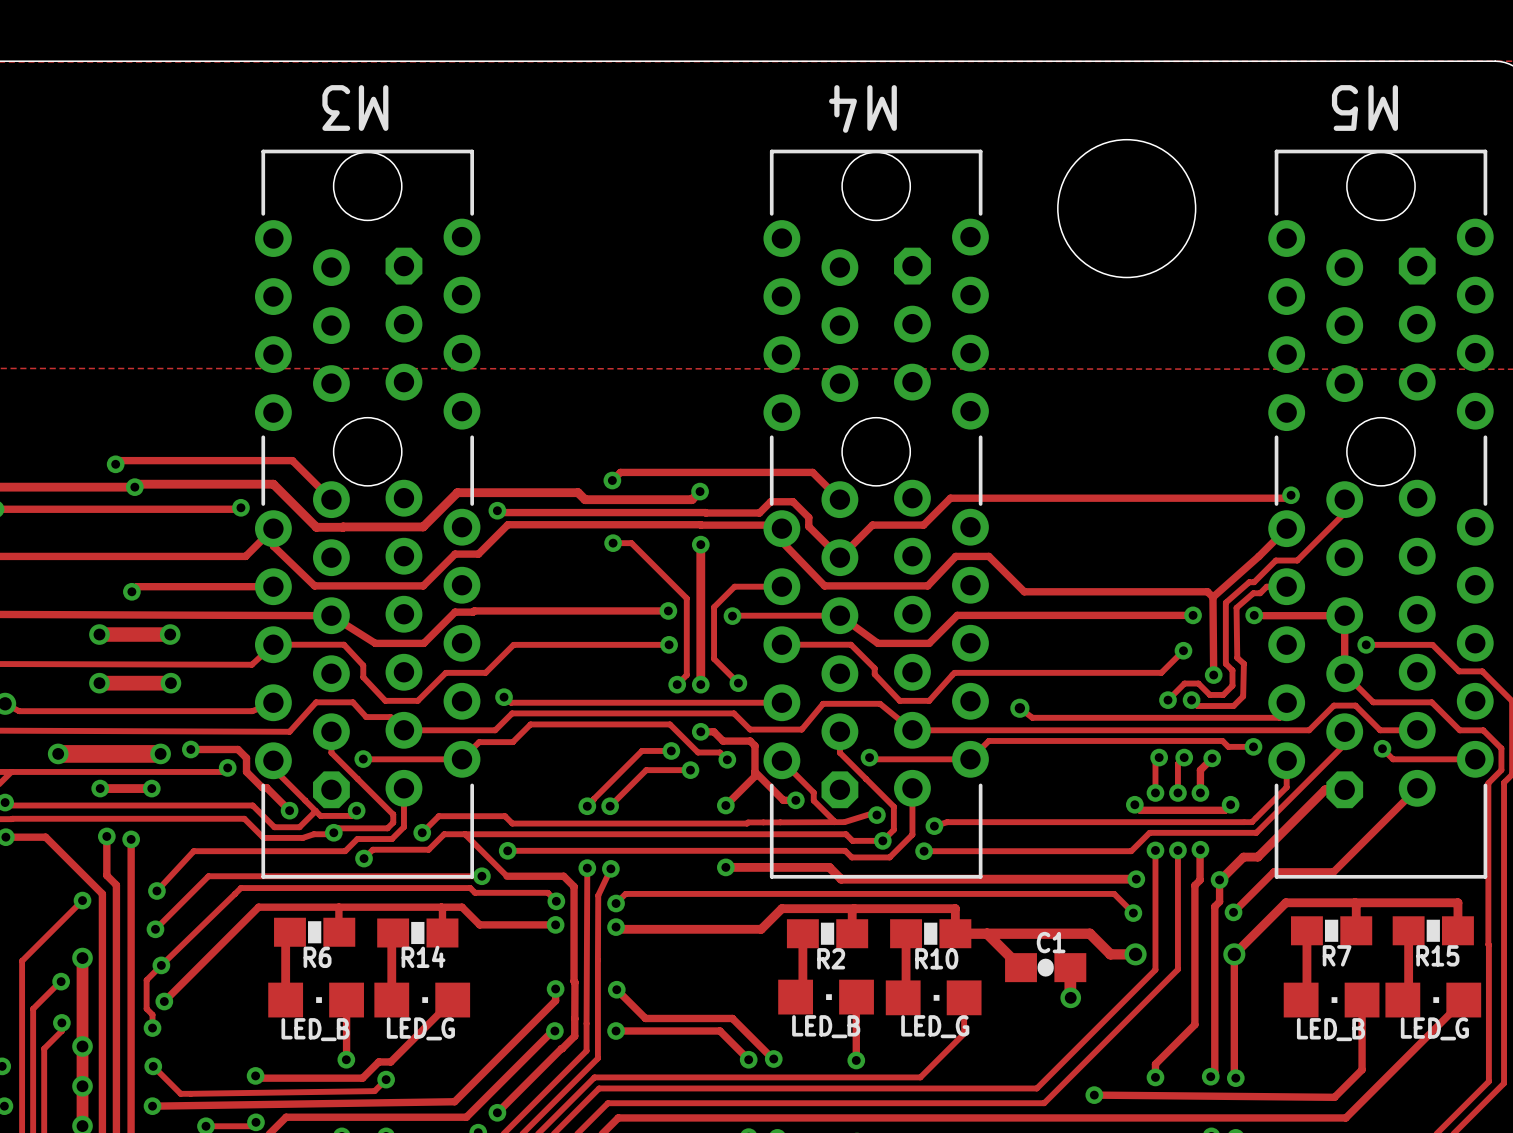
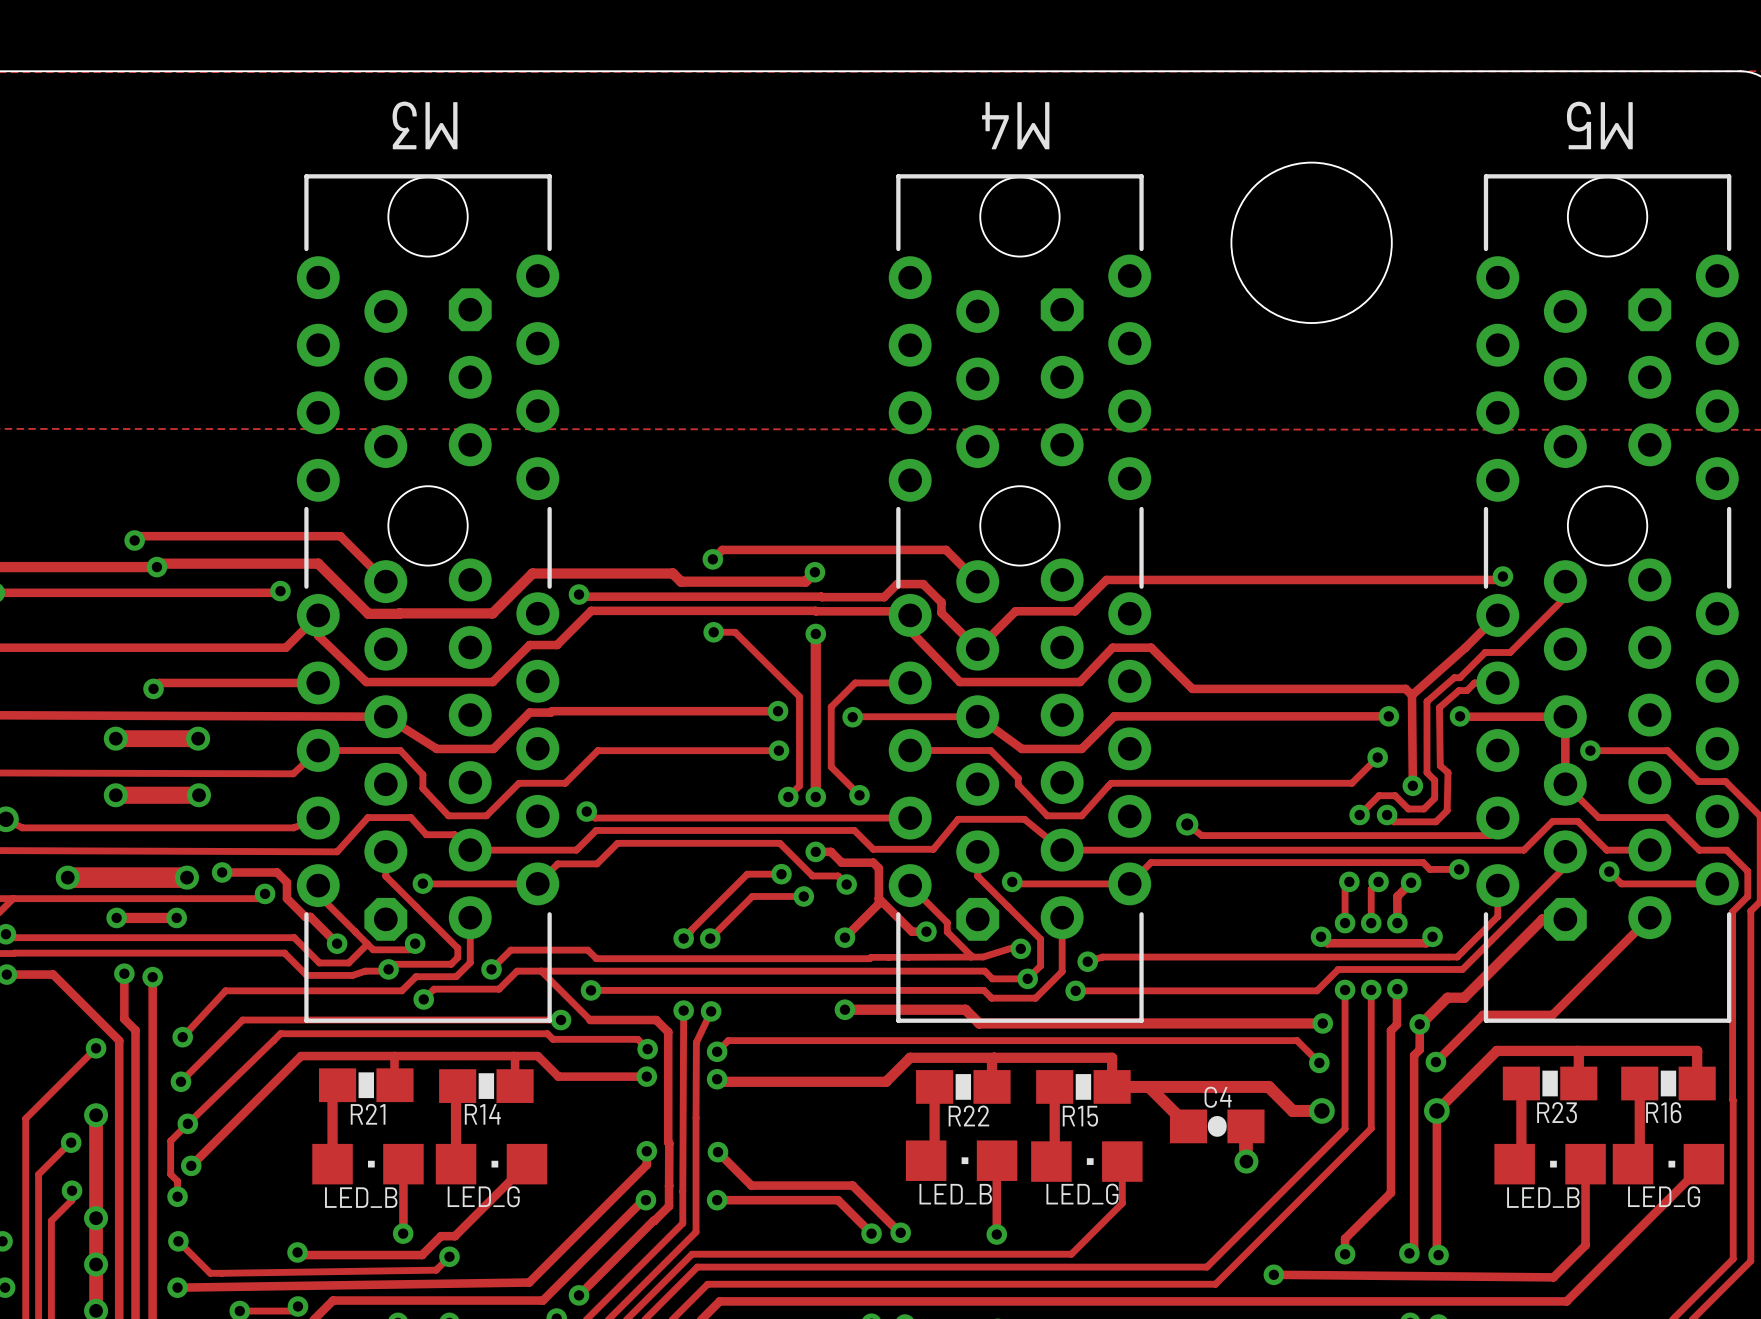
C1 name: C1 (1051, 942) -> C4 (1218, 1097)
R7 name: R7 (1337, 955) -> R23 (1557, 1112)
R15 name: R15 (1437, 955) -> R16 (1663, 1112)
R6 name: R6 (317, 957) -> R21 (368, 1114)
R2 name: R2 (831, 958) -> R22 (968, 1115)
R10 name: R10 (936, 958) -> R15 (1080, 1116)

